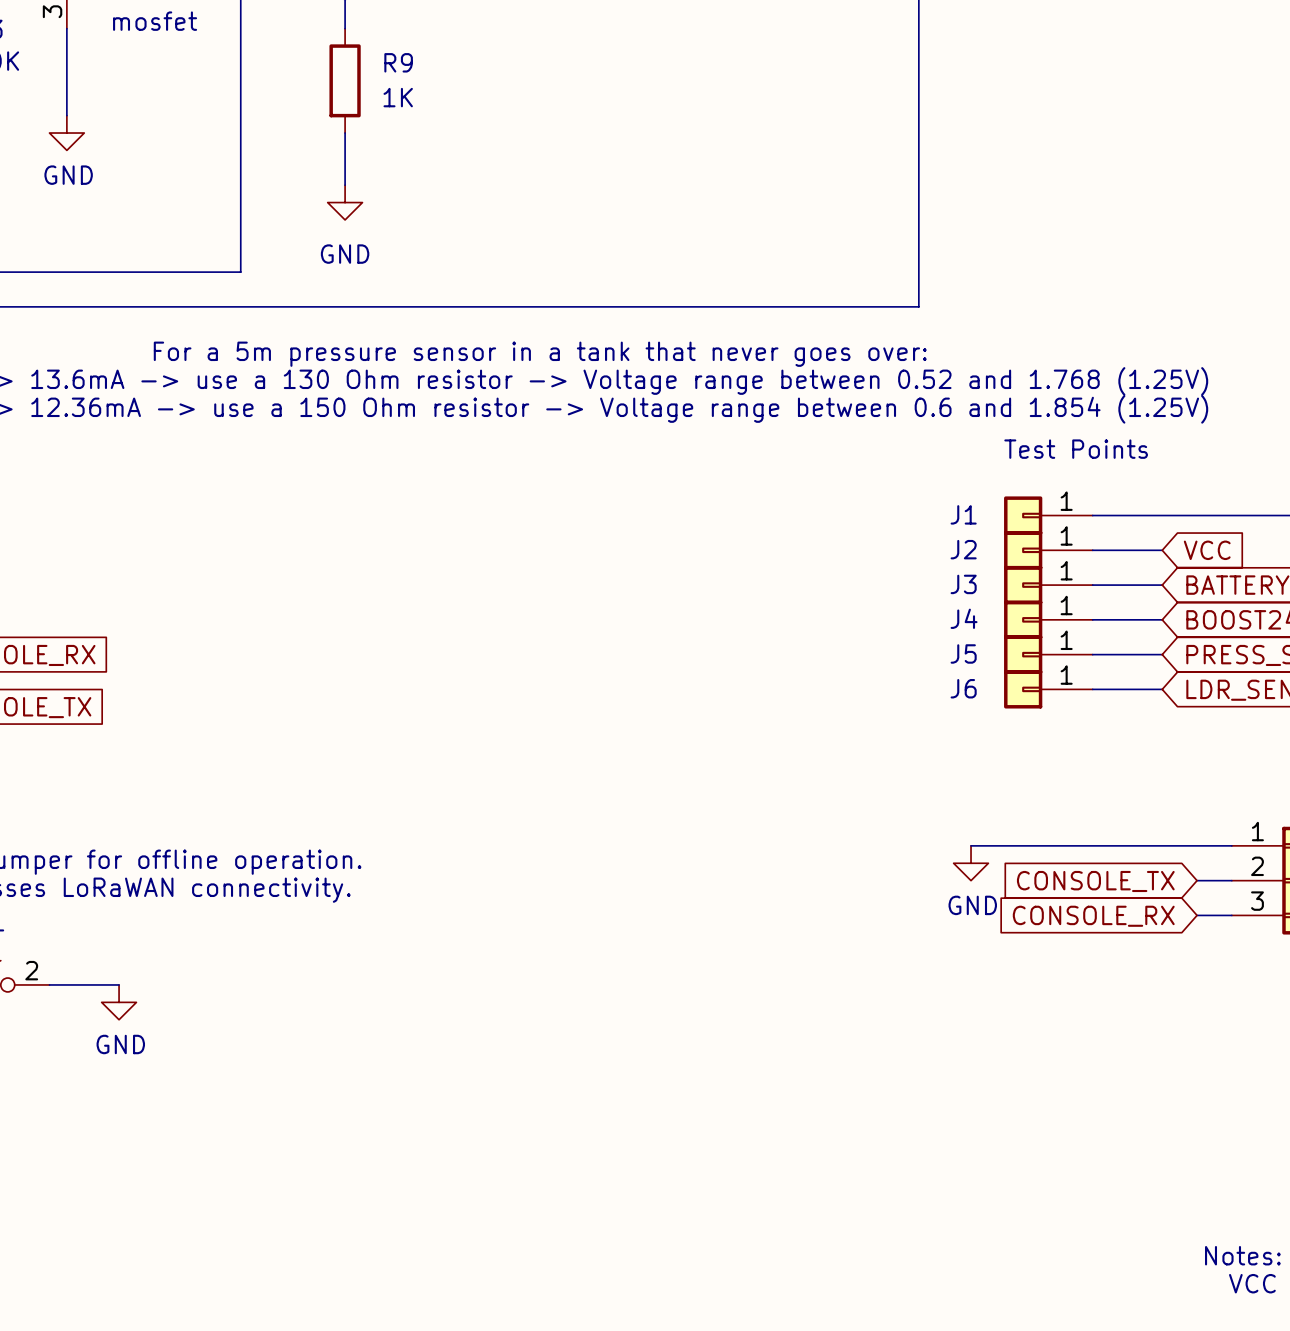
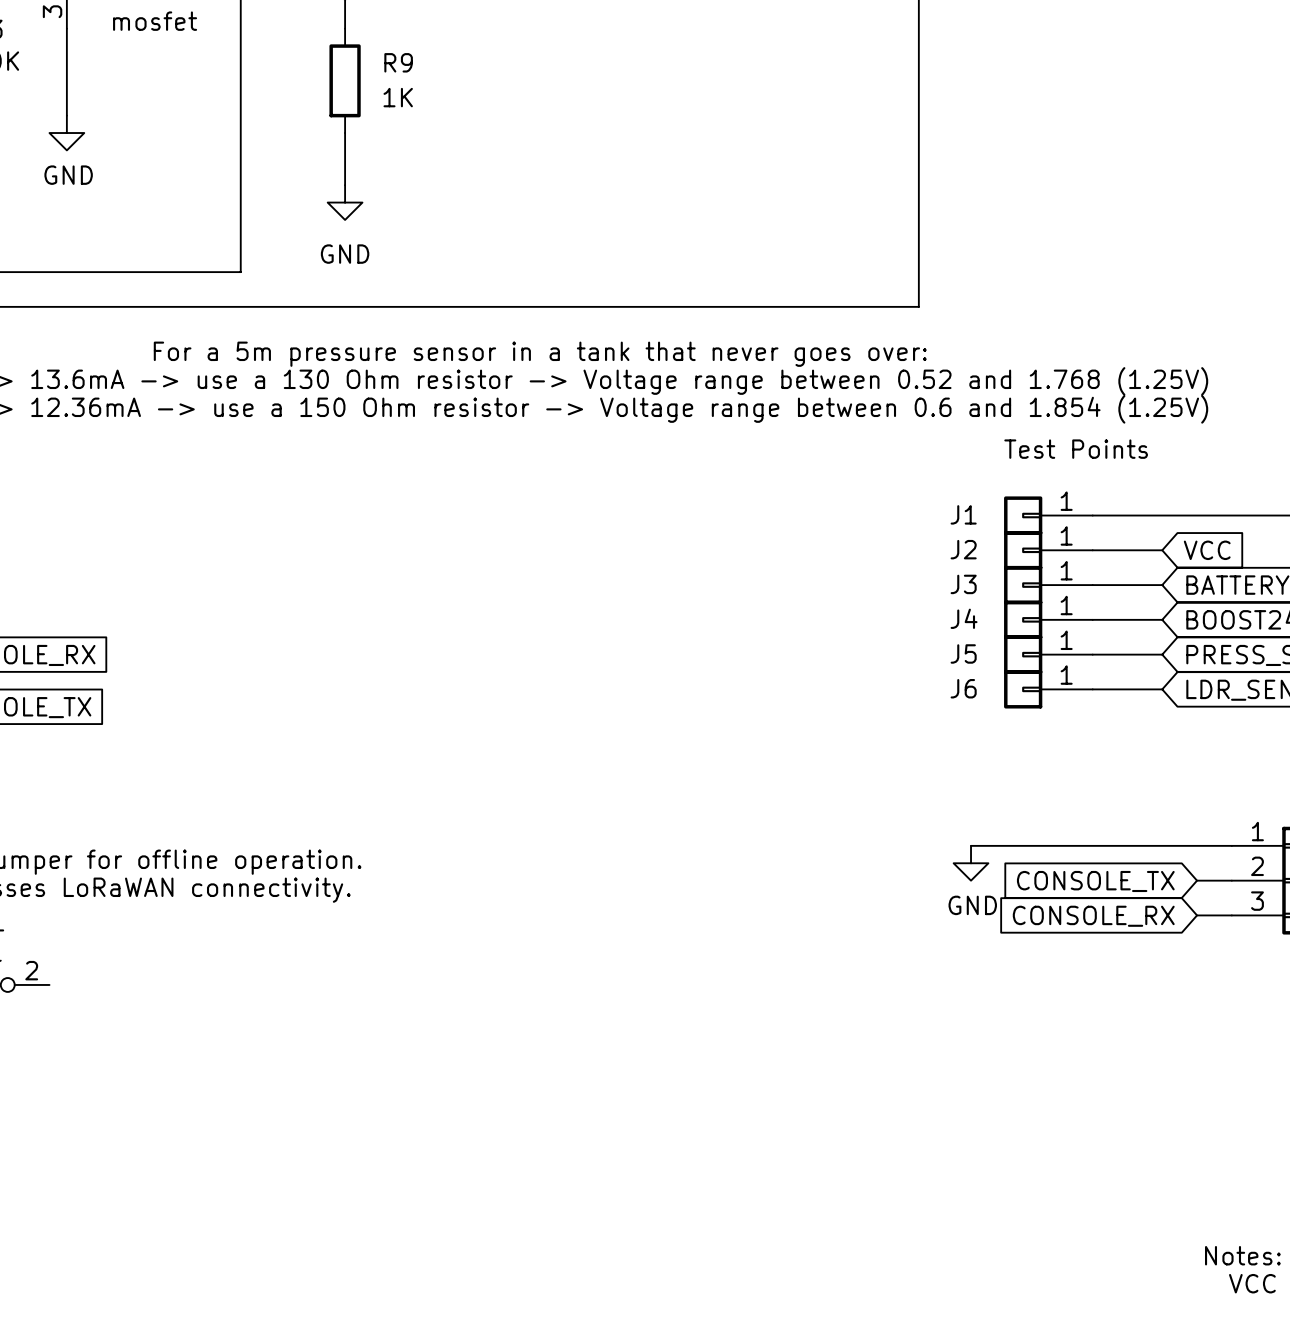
wire: (49, 984) (119, 984) -> none
power symbol: GND (119, 1002) -> none

